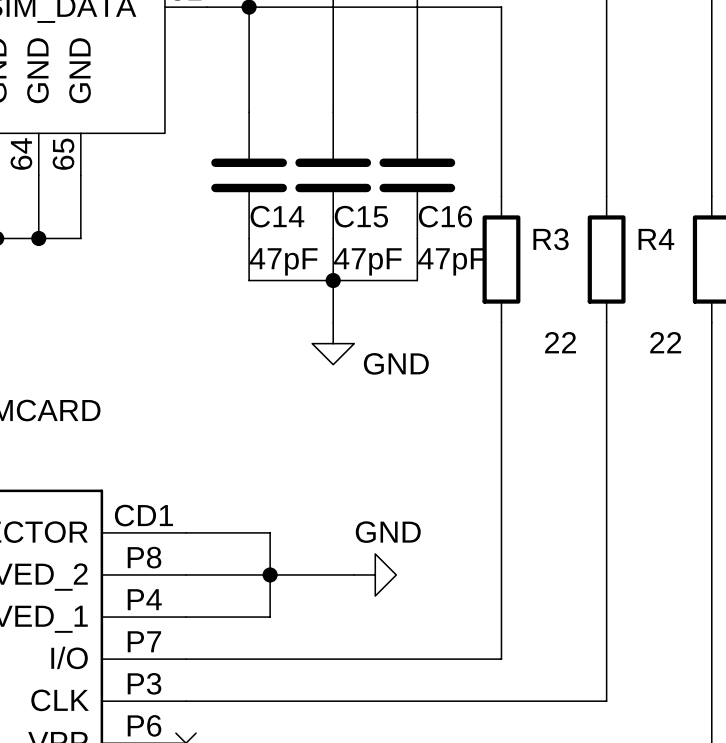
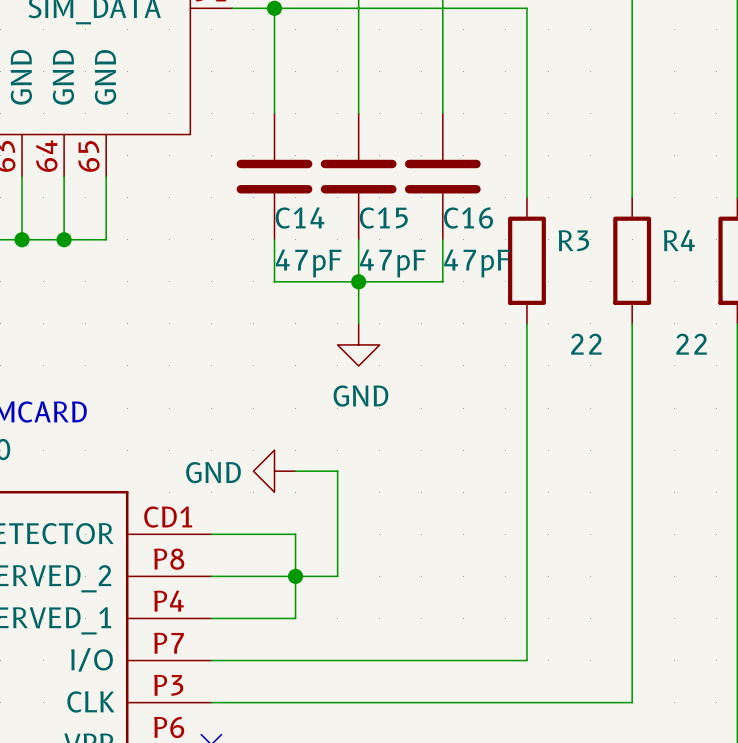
power symbol text position: GND (396, 363) -> GND (360, 396)
power symbol text position: GND (388, 532) -> GND (213, 472)
wire: (312, 574) (354, 574) -> (337, 576) (337, 471) (295, 471)
power symbol rotation: 0° (375, 574) -> 180° (274, 471)
power symbol position: GND (375, 574) -> GND (274, 471)

